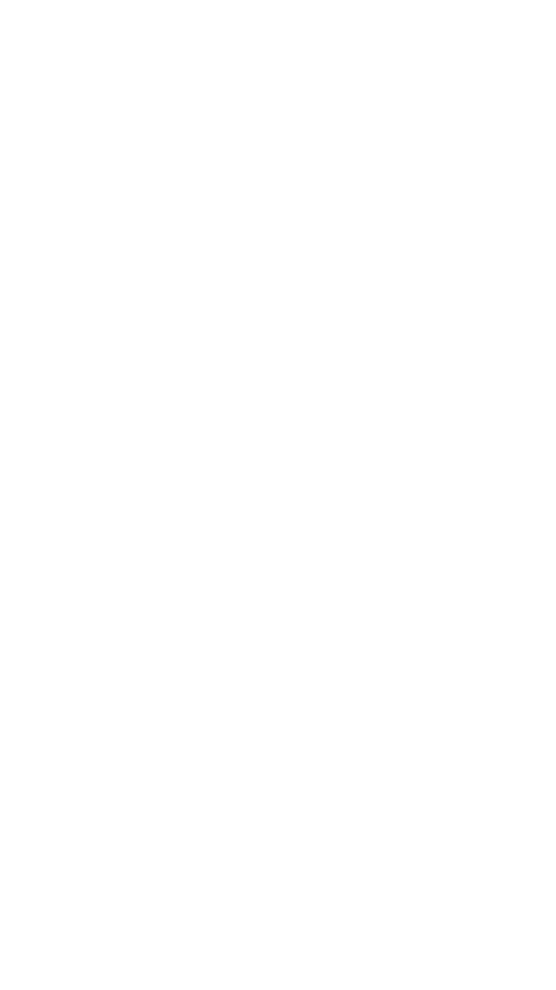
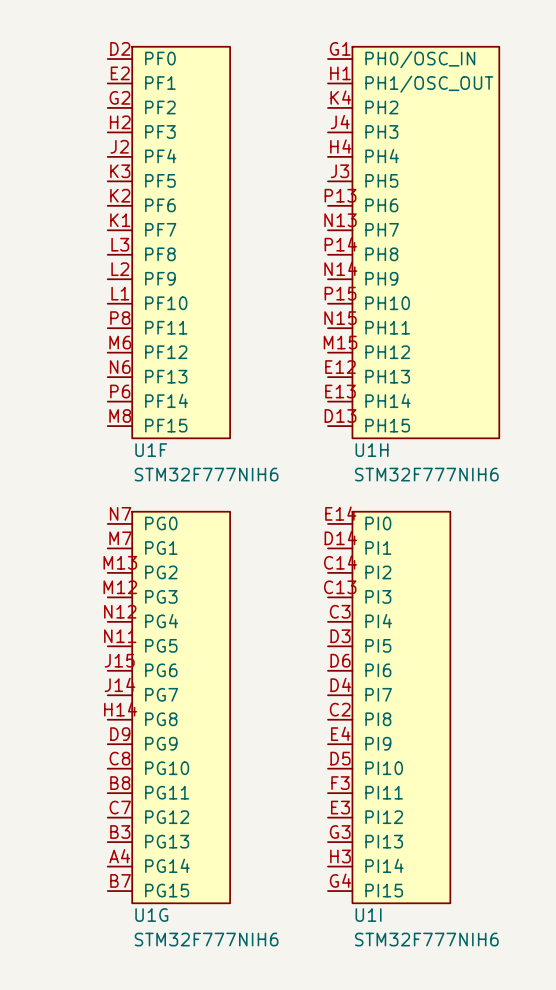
U1F: none -> STM32F777NIH6 (168, 242)
U1H: none -> STM32F777NIH6 (413, 242)
U1G: none -> STM32F777NIH6 (168, 707)
U1I: none -> STM32F777NIH6 (389, 707)

